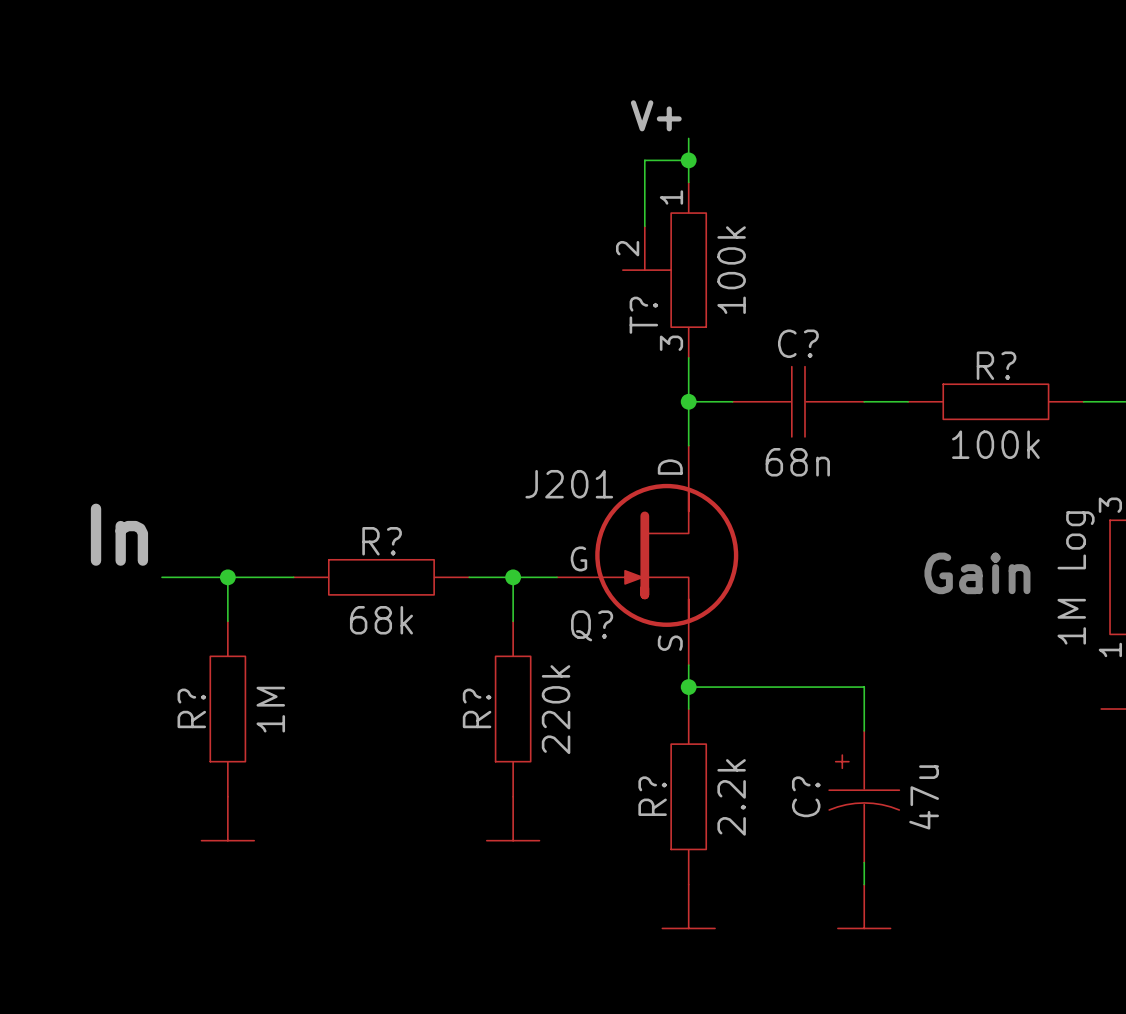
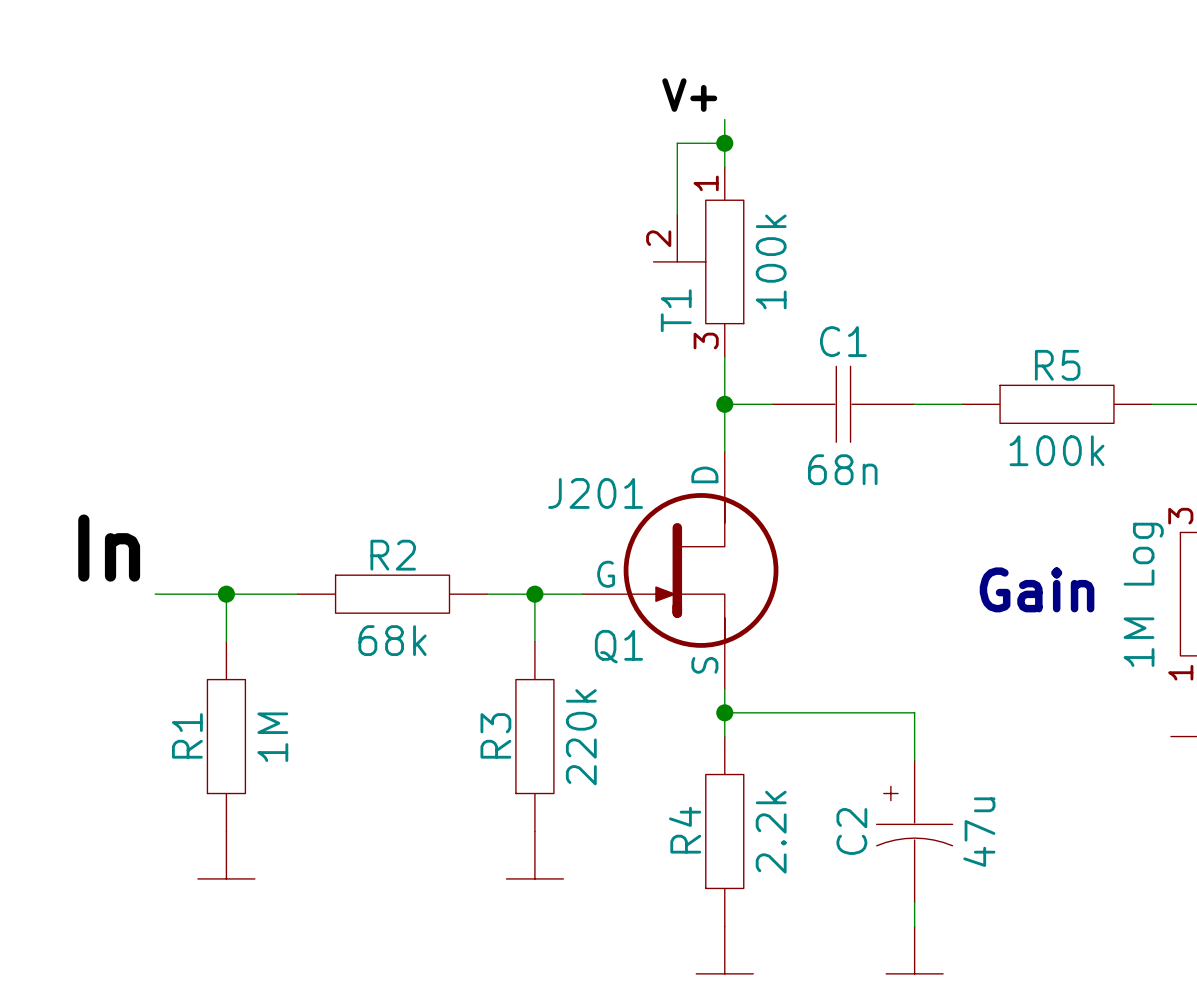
T? name: T? (643, 315) -> T1 (676, 310)
C? name: C? (798, 343) -> C1 (843, 341)
R? name: R? (996, 365) -> R5 (1057, 365)
R? name: R? (382, 541) -> R2 (393, 555)
Q? name: Q? (592, 625) -> Q1 (618, 646)
R? name: R? (191, 708) -> R1 (187, 735)
R? name: R? (477, 708) -> R3 (495, 735)
R? name: R? (652, 796) -> R4 (685, 830)
C? name: C? (806, 796) -> C2 (851, 831)

